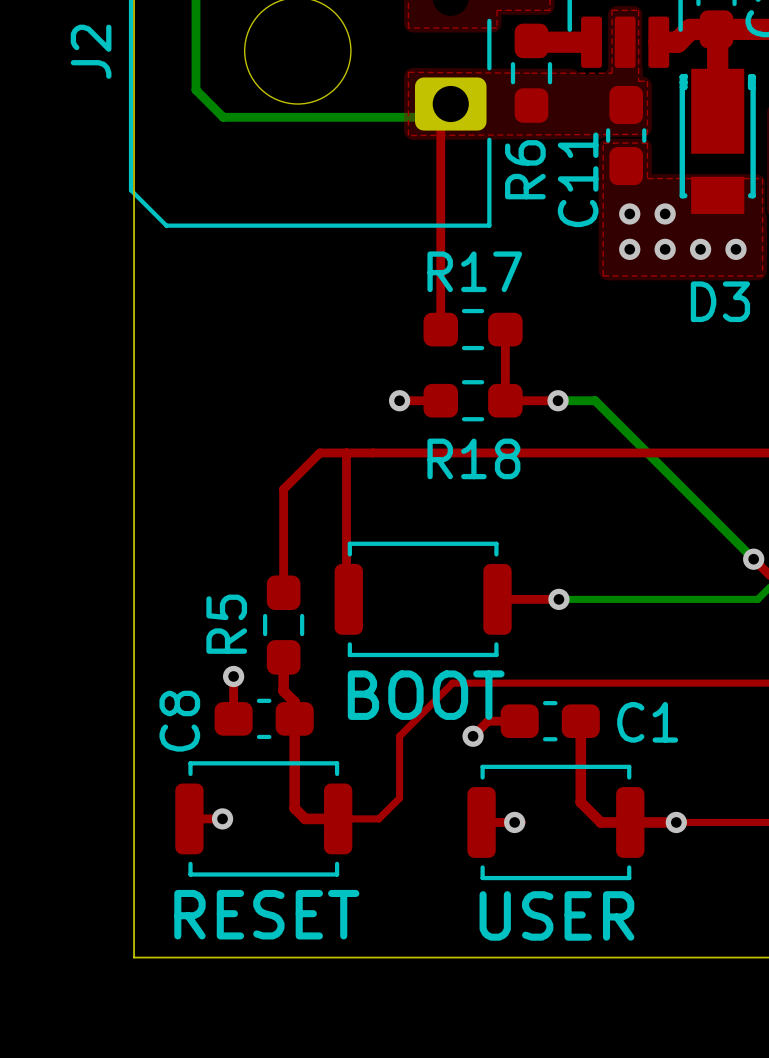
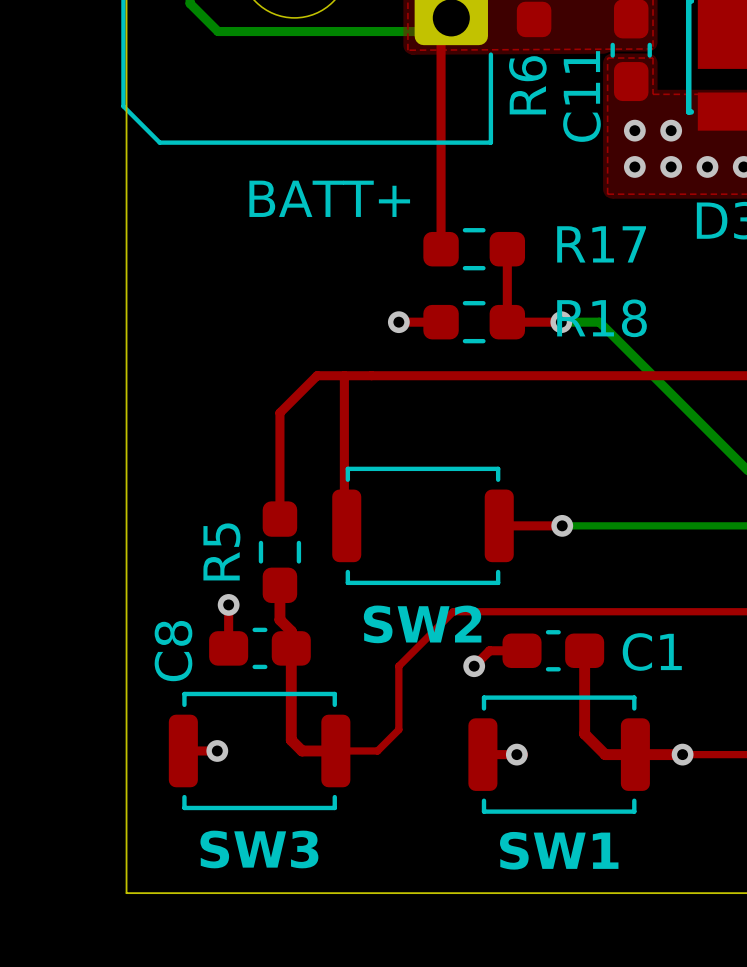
R17 name position: R17 (474, 271) -> R17 (601, 244)
text: none -> BATT+ (329, 198)
R18 name position: R18 (473, 458) -> R18 (602, 318)
BOOT name: BOOT (426, 695) -> SW2 (422, 624)
RESET name: RESET (266, 914) -> SW3 (259, 849)
USER name: USER (556, 915) -> SW1 (559, 850)

